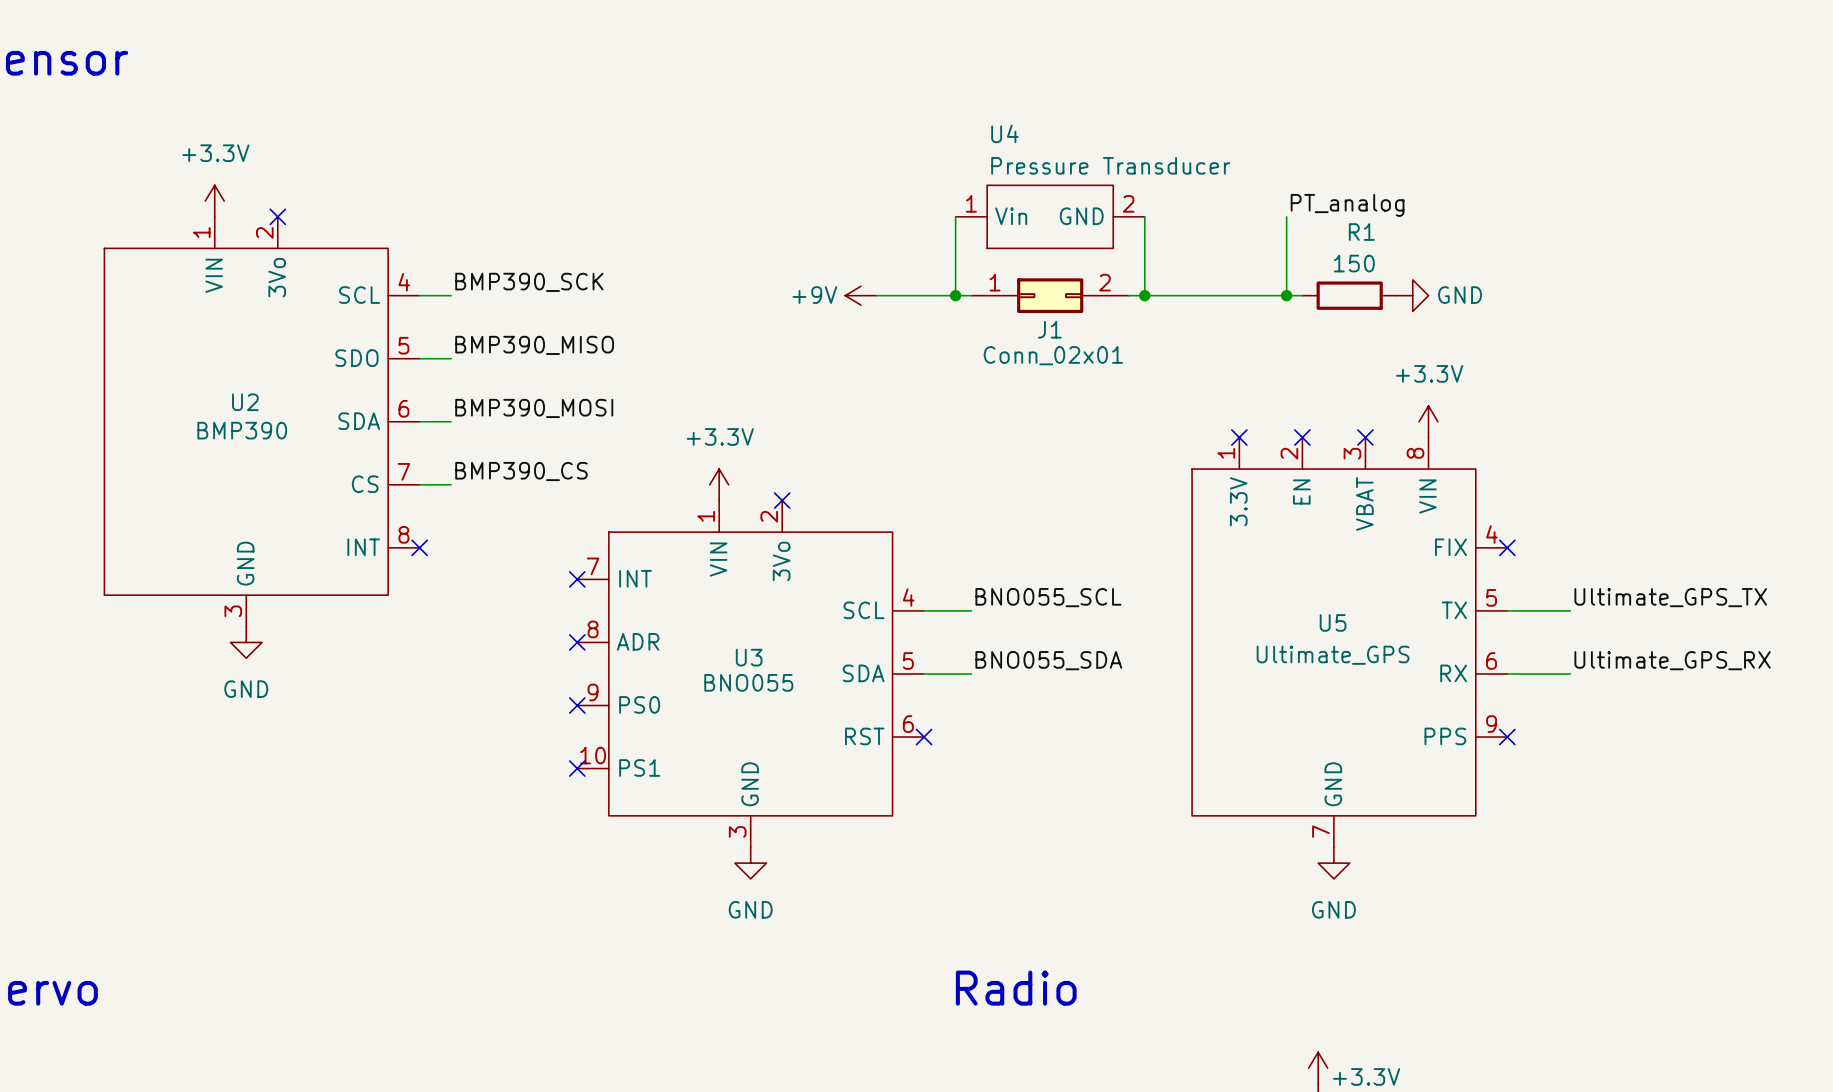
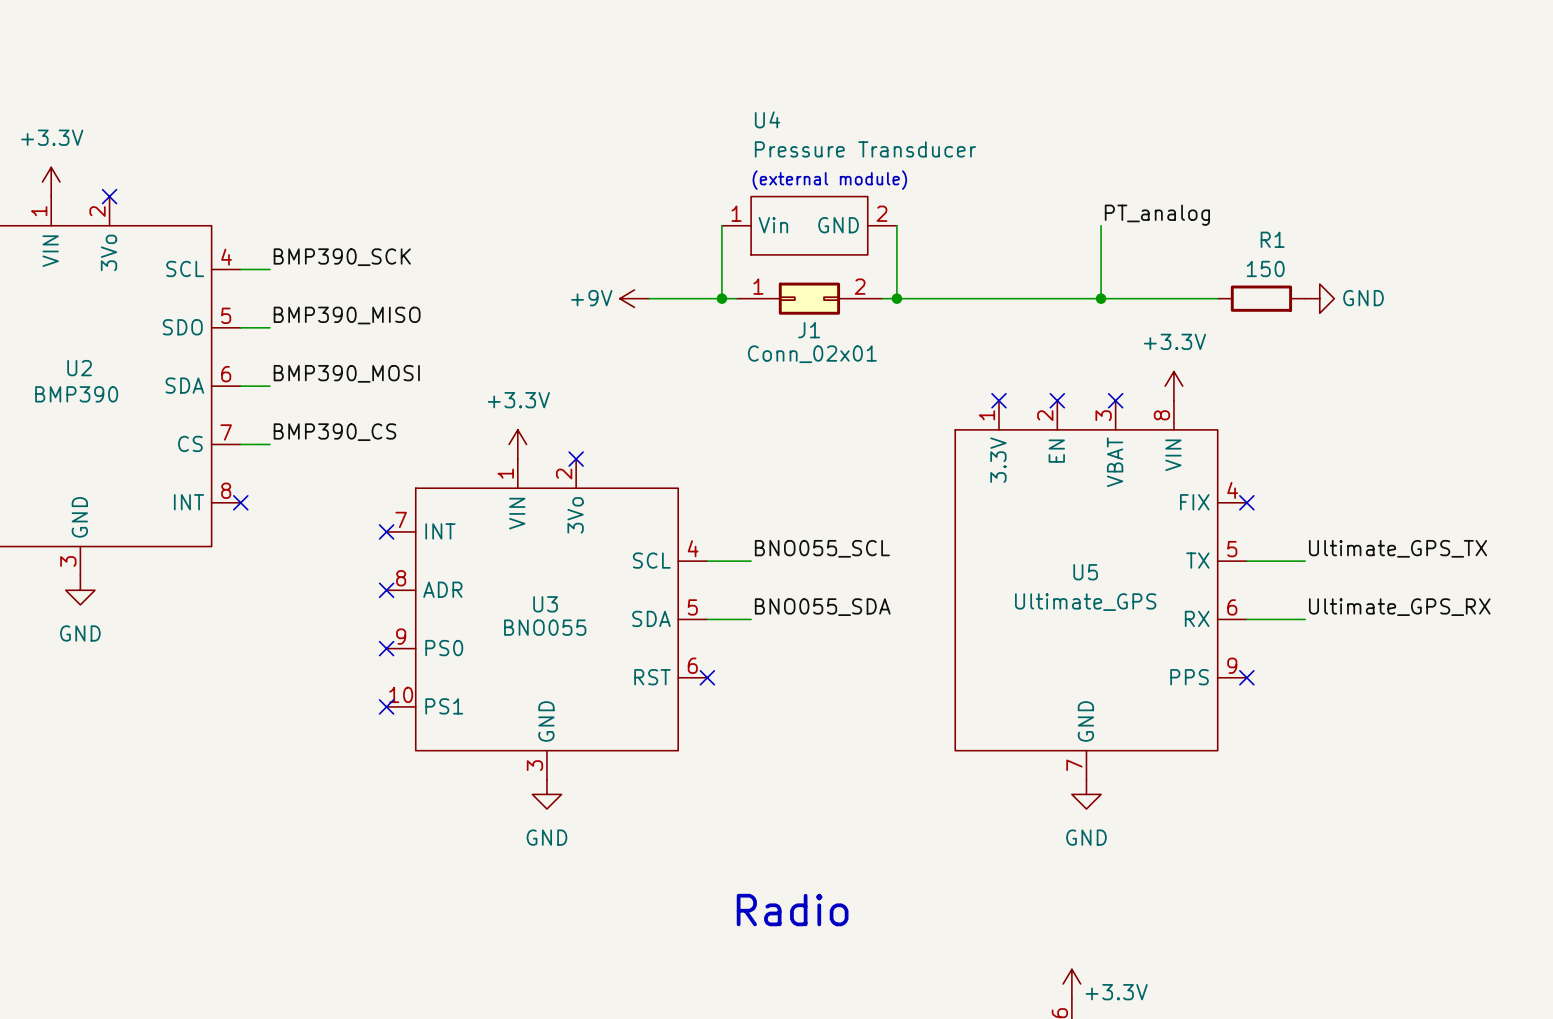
U4 name position: U4 (1004, 133) -> U4 (767, 119)
U4 value position: Pressure Transducer (1110, 165) -> Pressure Transducer (865, 149)
text: none -> (external module) (829, 180)
label position: PT_analog (1347, 205) -> PT_analog (1157, 215)
wire: (955, 216) (955, 295) -> (721, 225) (721, 298)
U4 position: (1050, 216) -> (809, 225)
wire: (1144, 216) (1144, 295) -> (896, 225) (896, 298)
wire: (1286, 216) (1286, 295) -> (1101, 225) (1101, 298)
power symbol position: +9V (861, 295) -> +9V (634, 298)
wire: (876, 295) (971, 295) -> (649, 298) (736, 298)
junction position: (955, 295) -> (721, 298)
J1 position: (1050, 295) -> (809, 298)
wire: (1129, 295) (1302, 295) -> none
junction position: (1144, 295) -> (896, 298)
junction position: (1286, 295) -> (1101, 298)
R1 position: (1349, 295) -> (1261, 298)
power symbol position: GND (1412, 295) -> GND (1319, 298)
wire: none -> (882, 298) (1217, 298)

